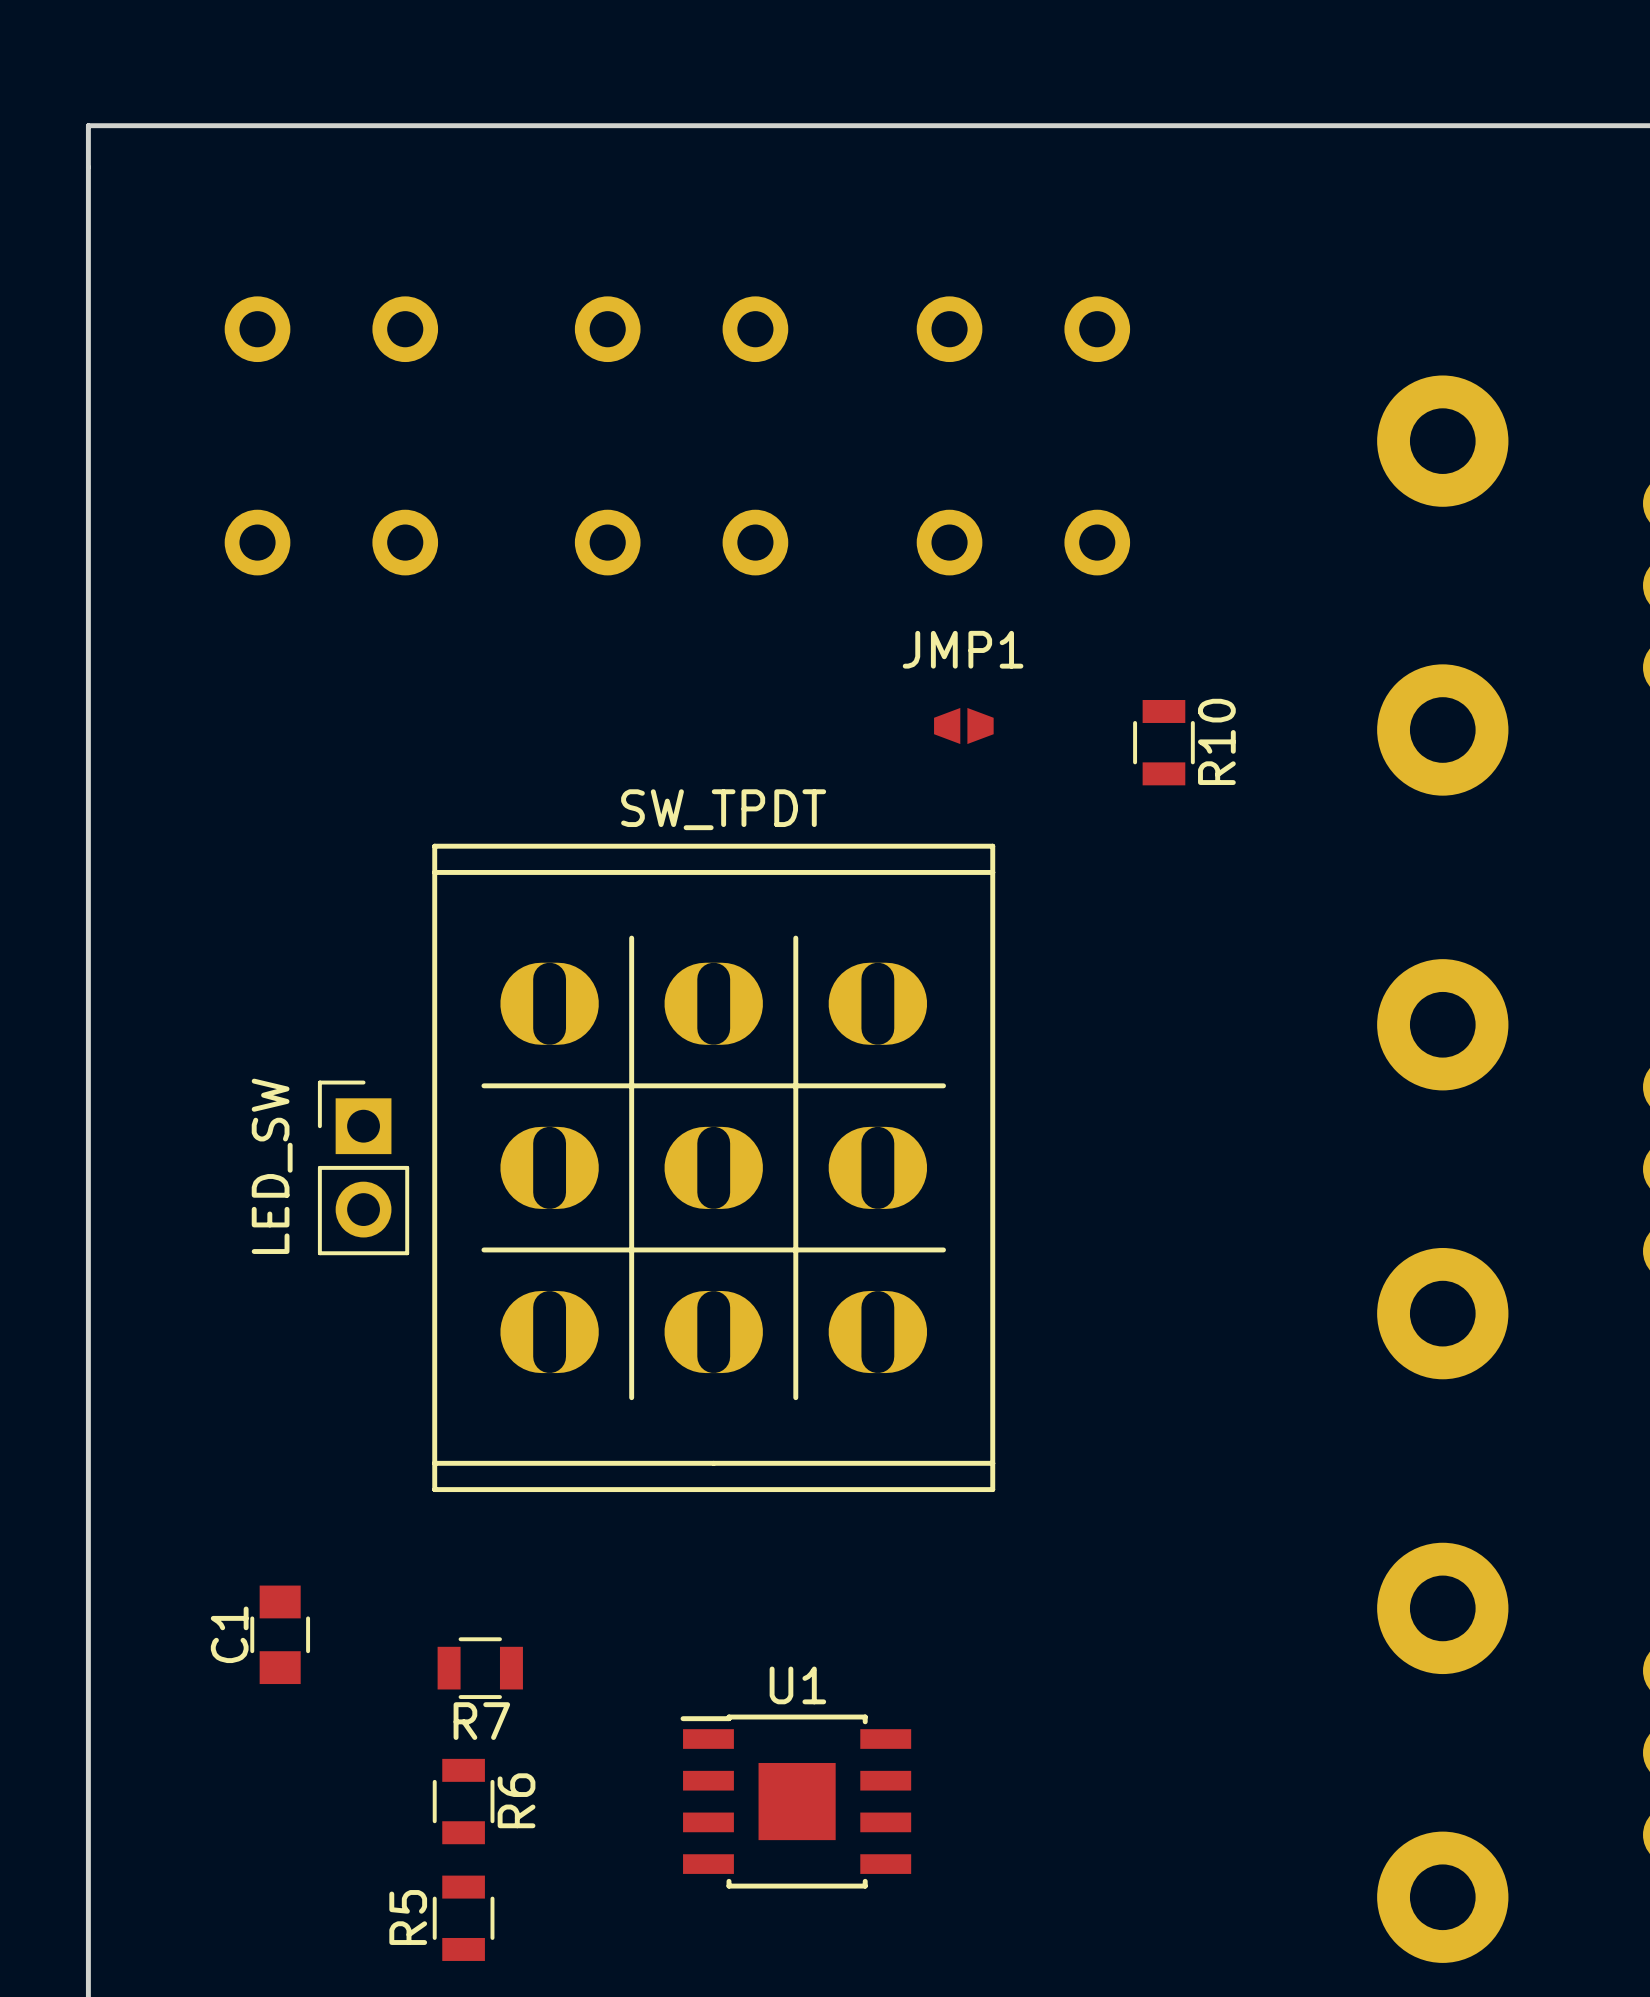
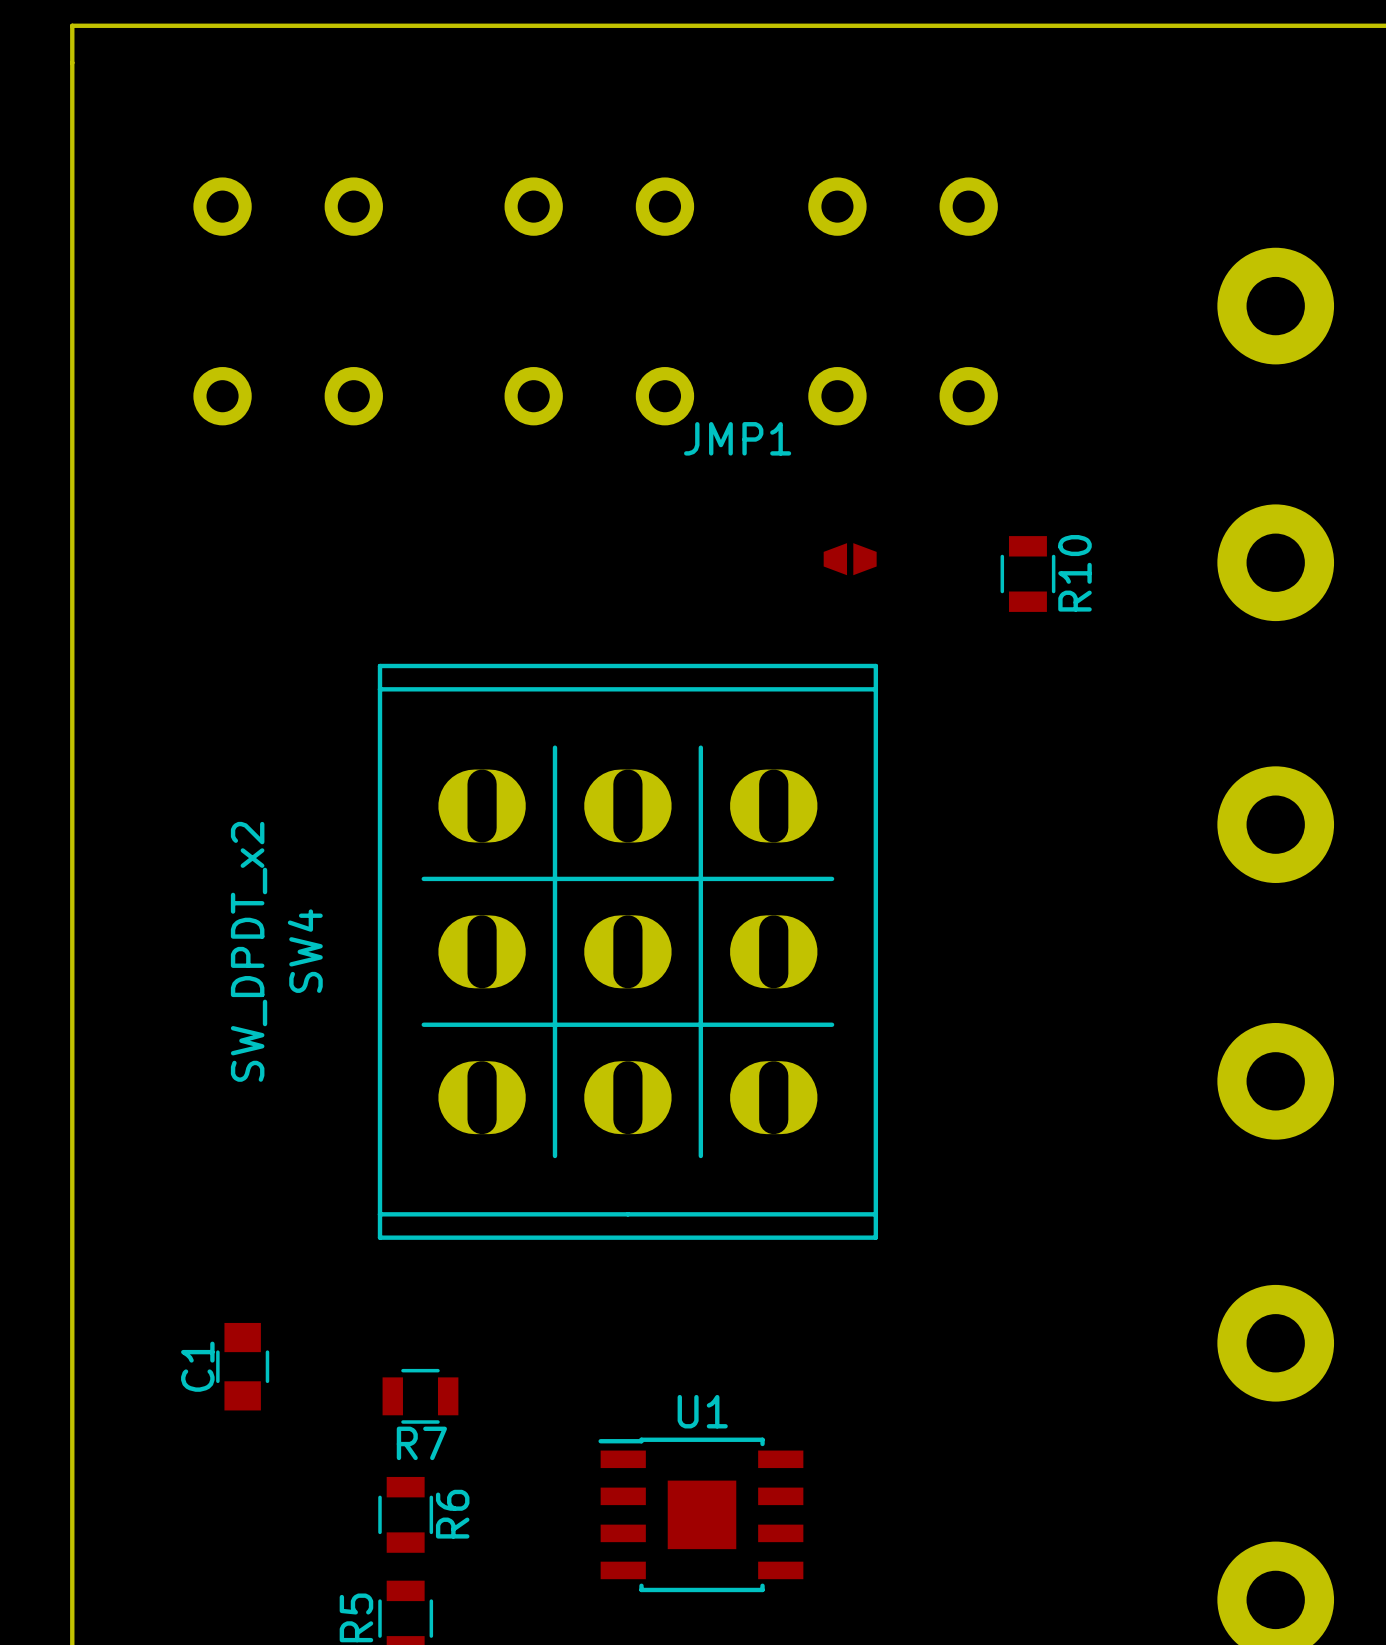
JMP1 name position: JMP1 (963, 649) -> JMP1 (737, 438)
SW4 value: SW_TPDT (723, 809) -> SW_DPDT_x2 (249, 951)
SW4 name: none -> SW4 (305, 951)
LED_SW: (363, 1167) -> none

